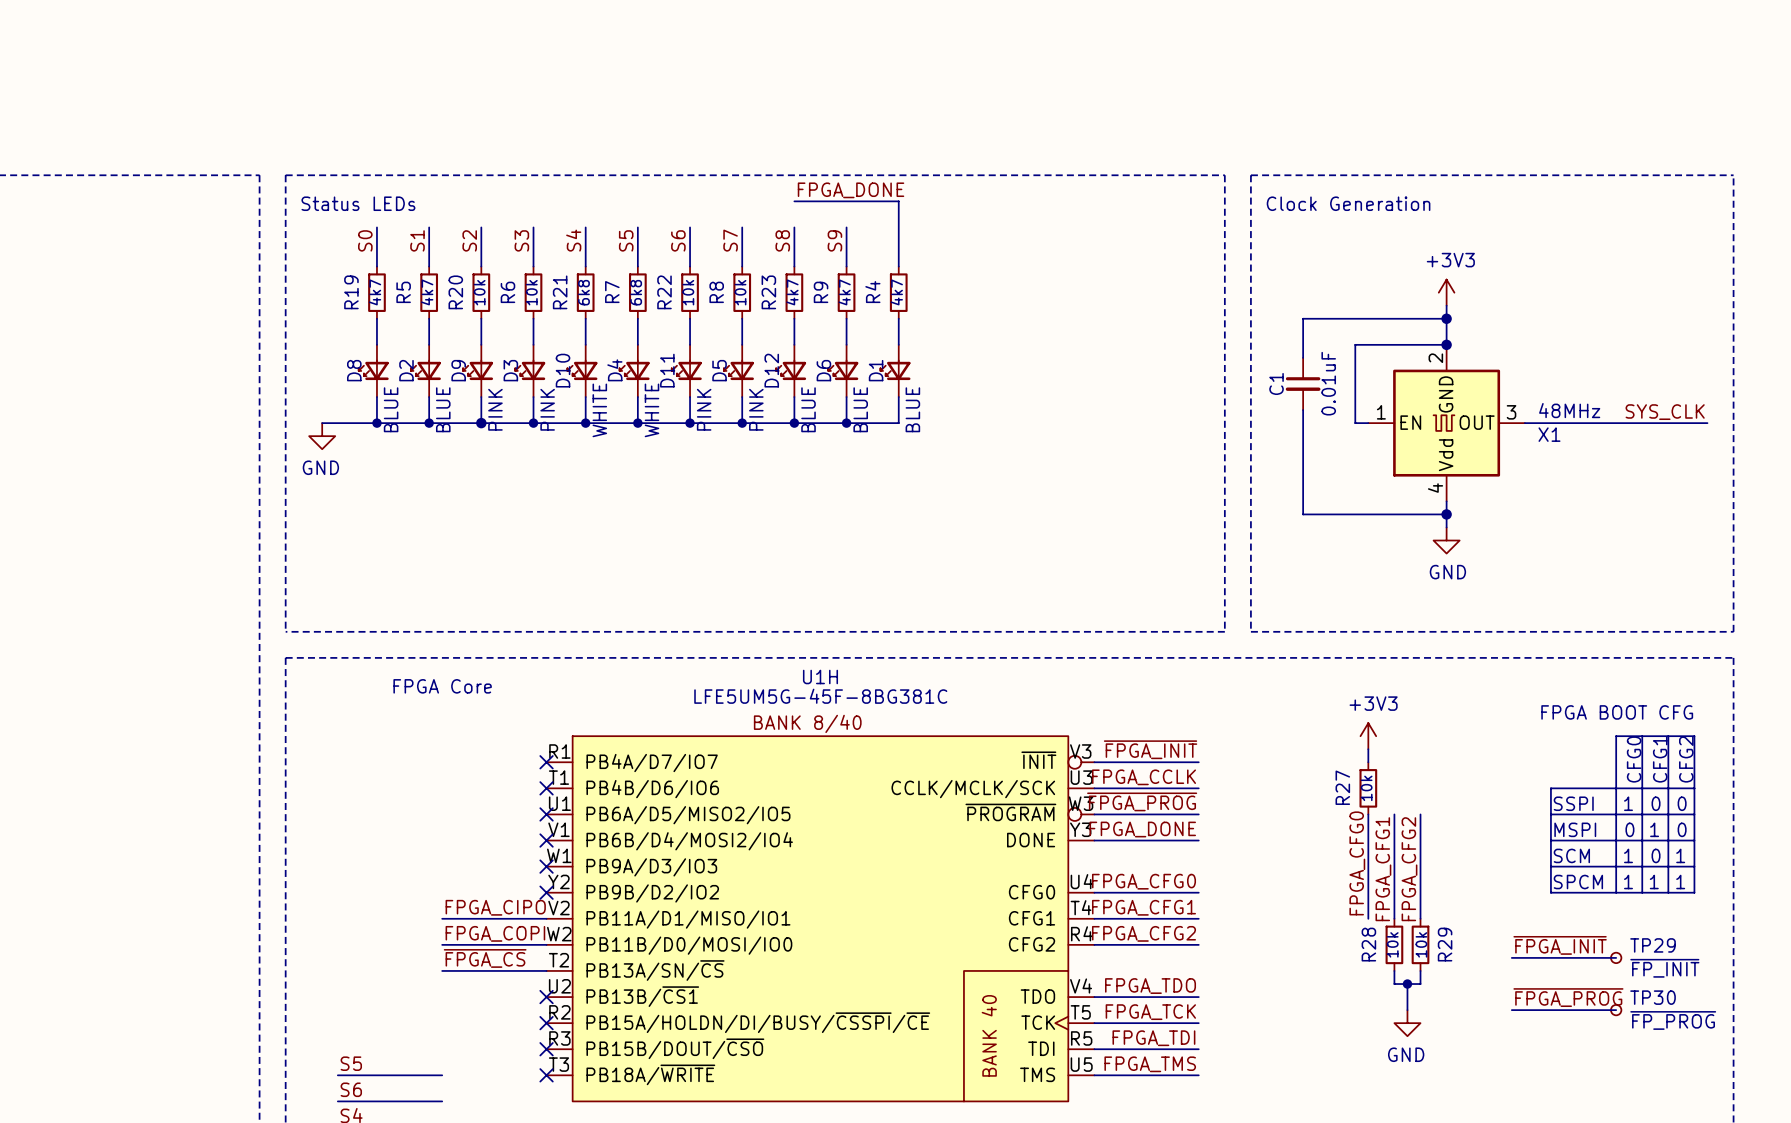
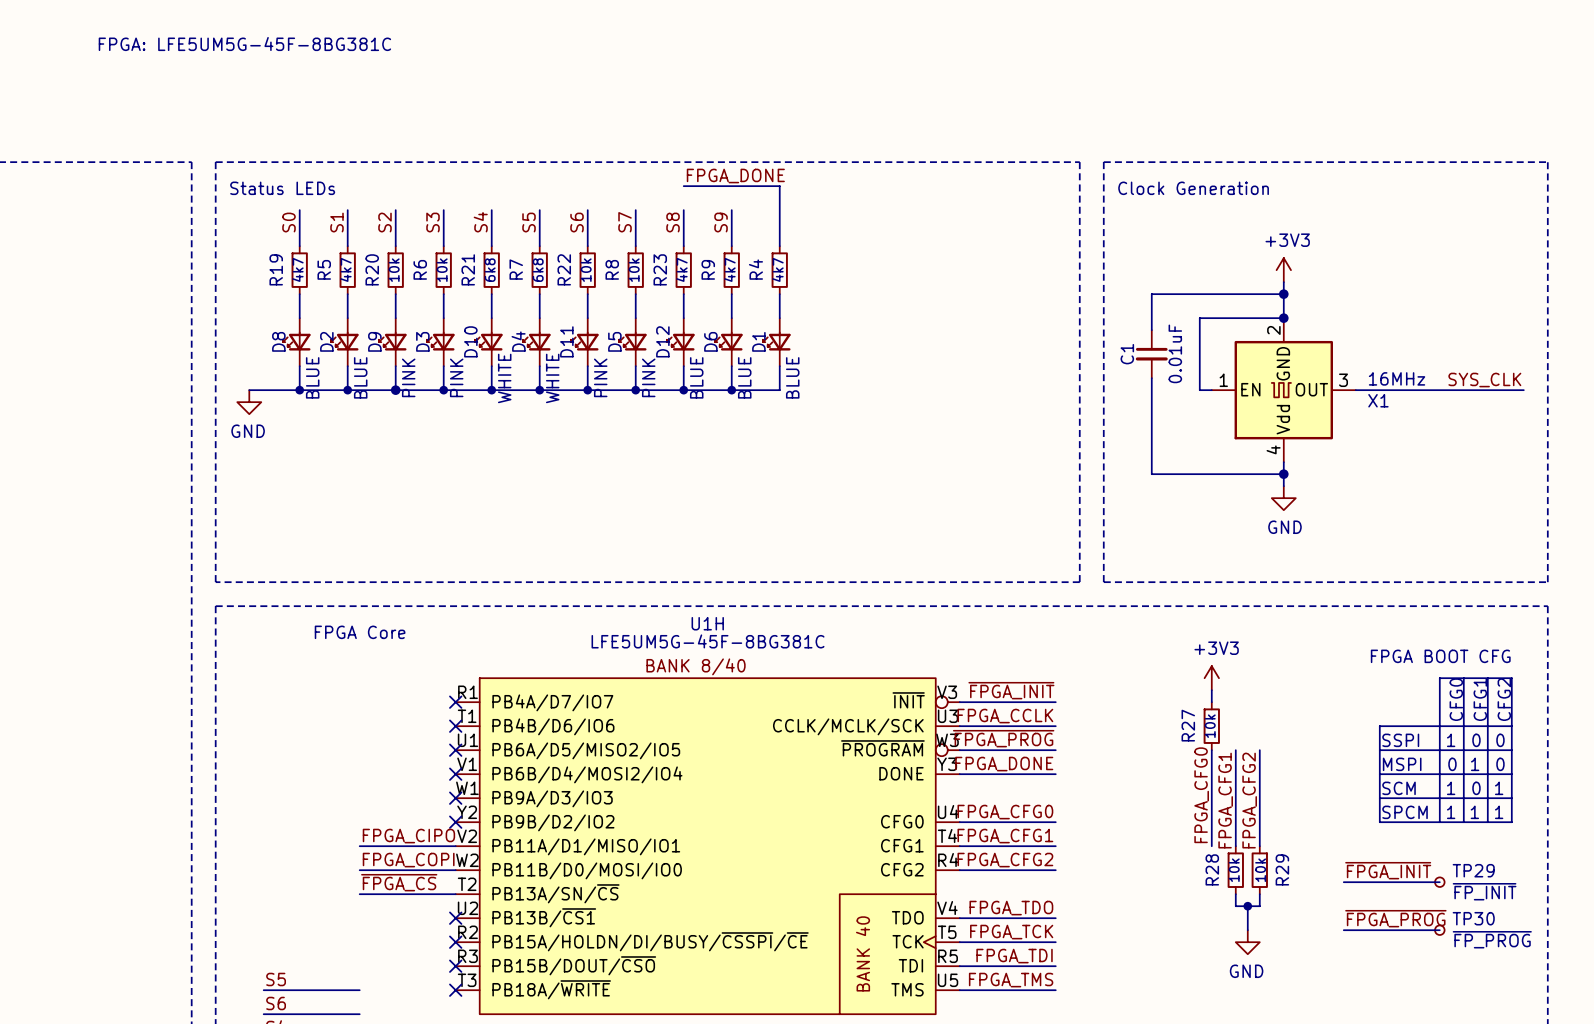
text: none -> FPGA: LFE5UM5G-45F-8BG381C (244, 44)
X1 value: 48MHz (1569, 410) -> 16MHz (1397, 378)

